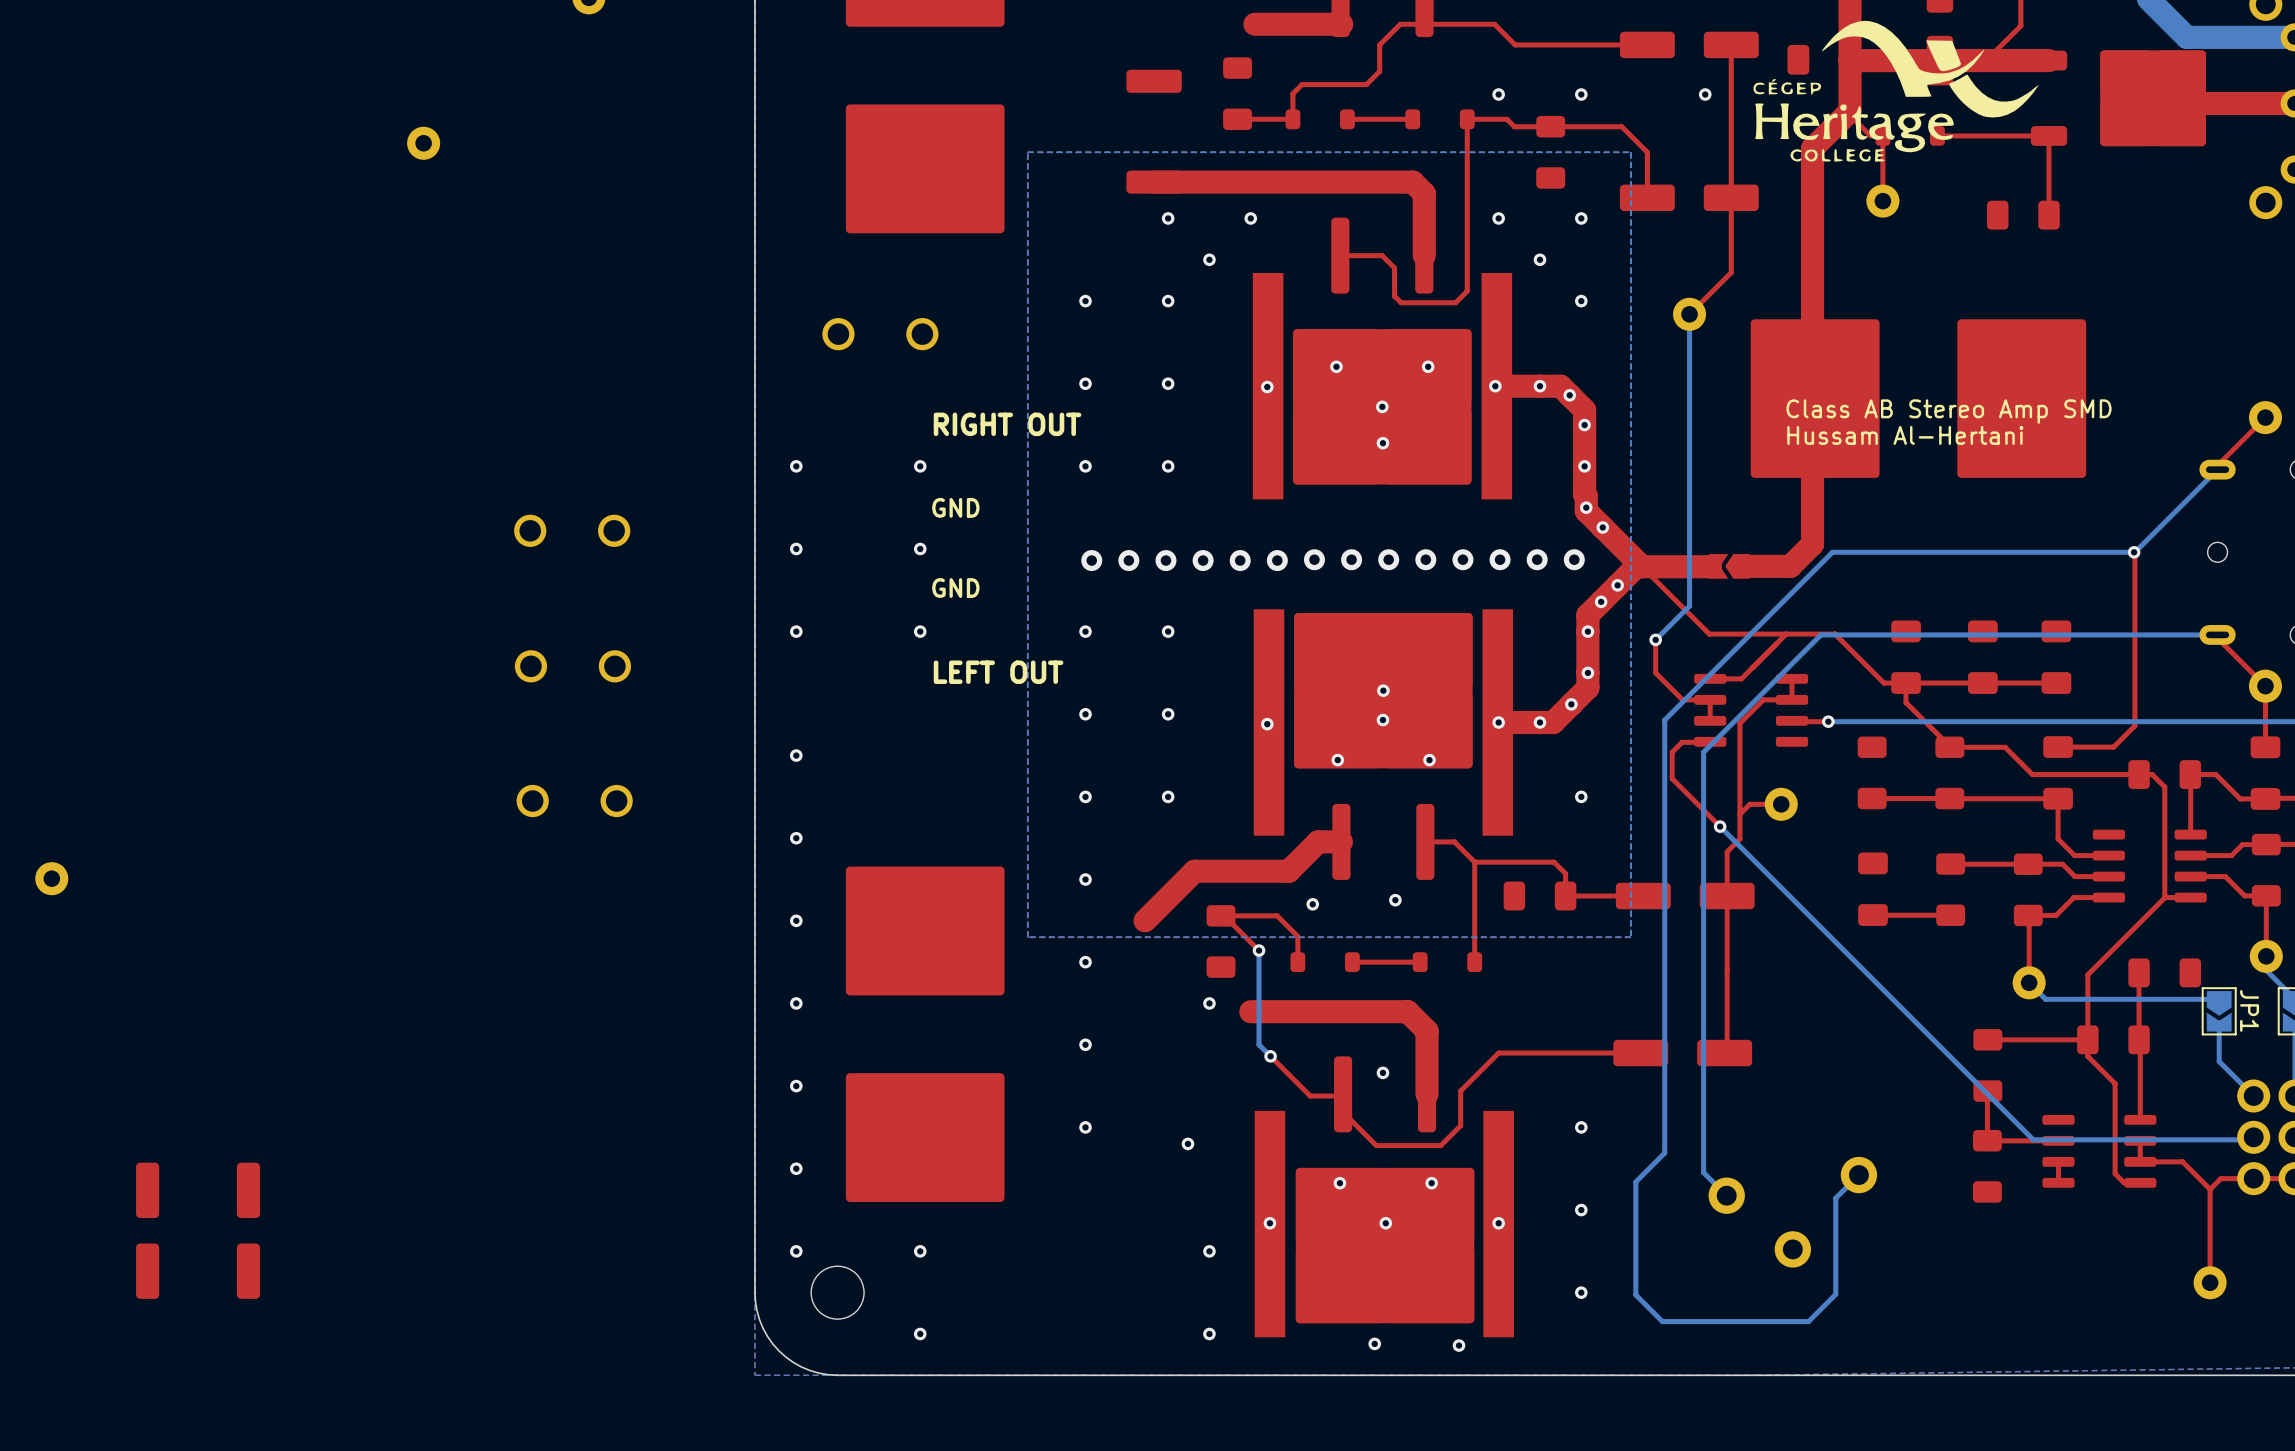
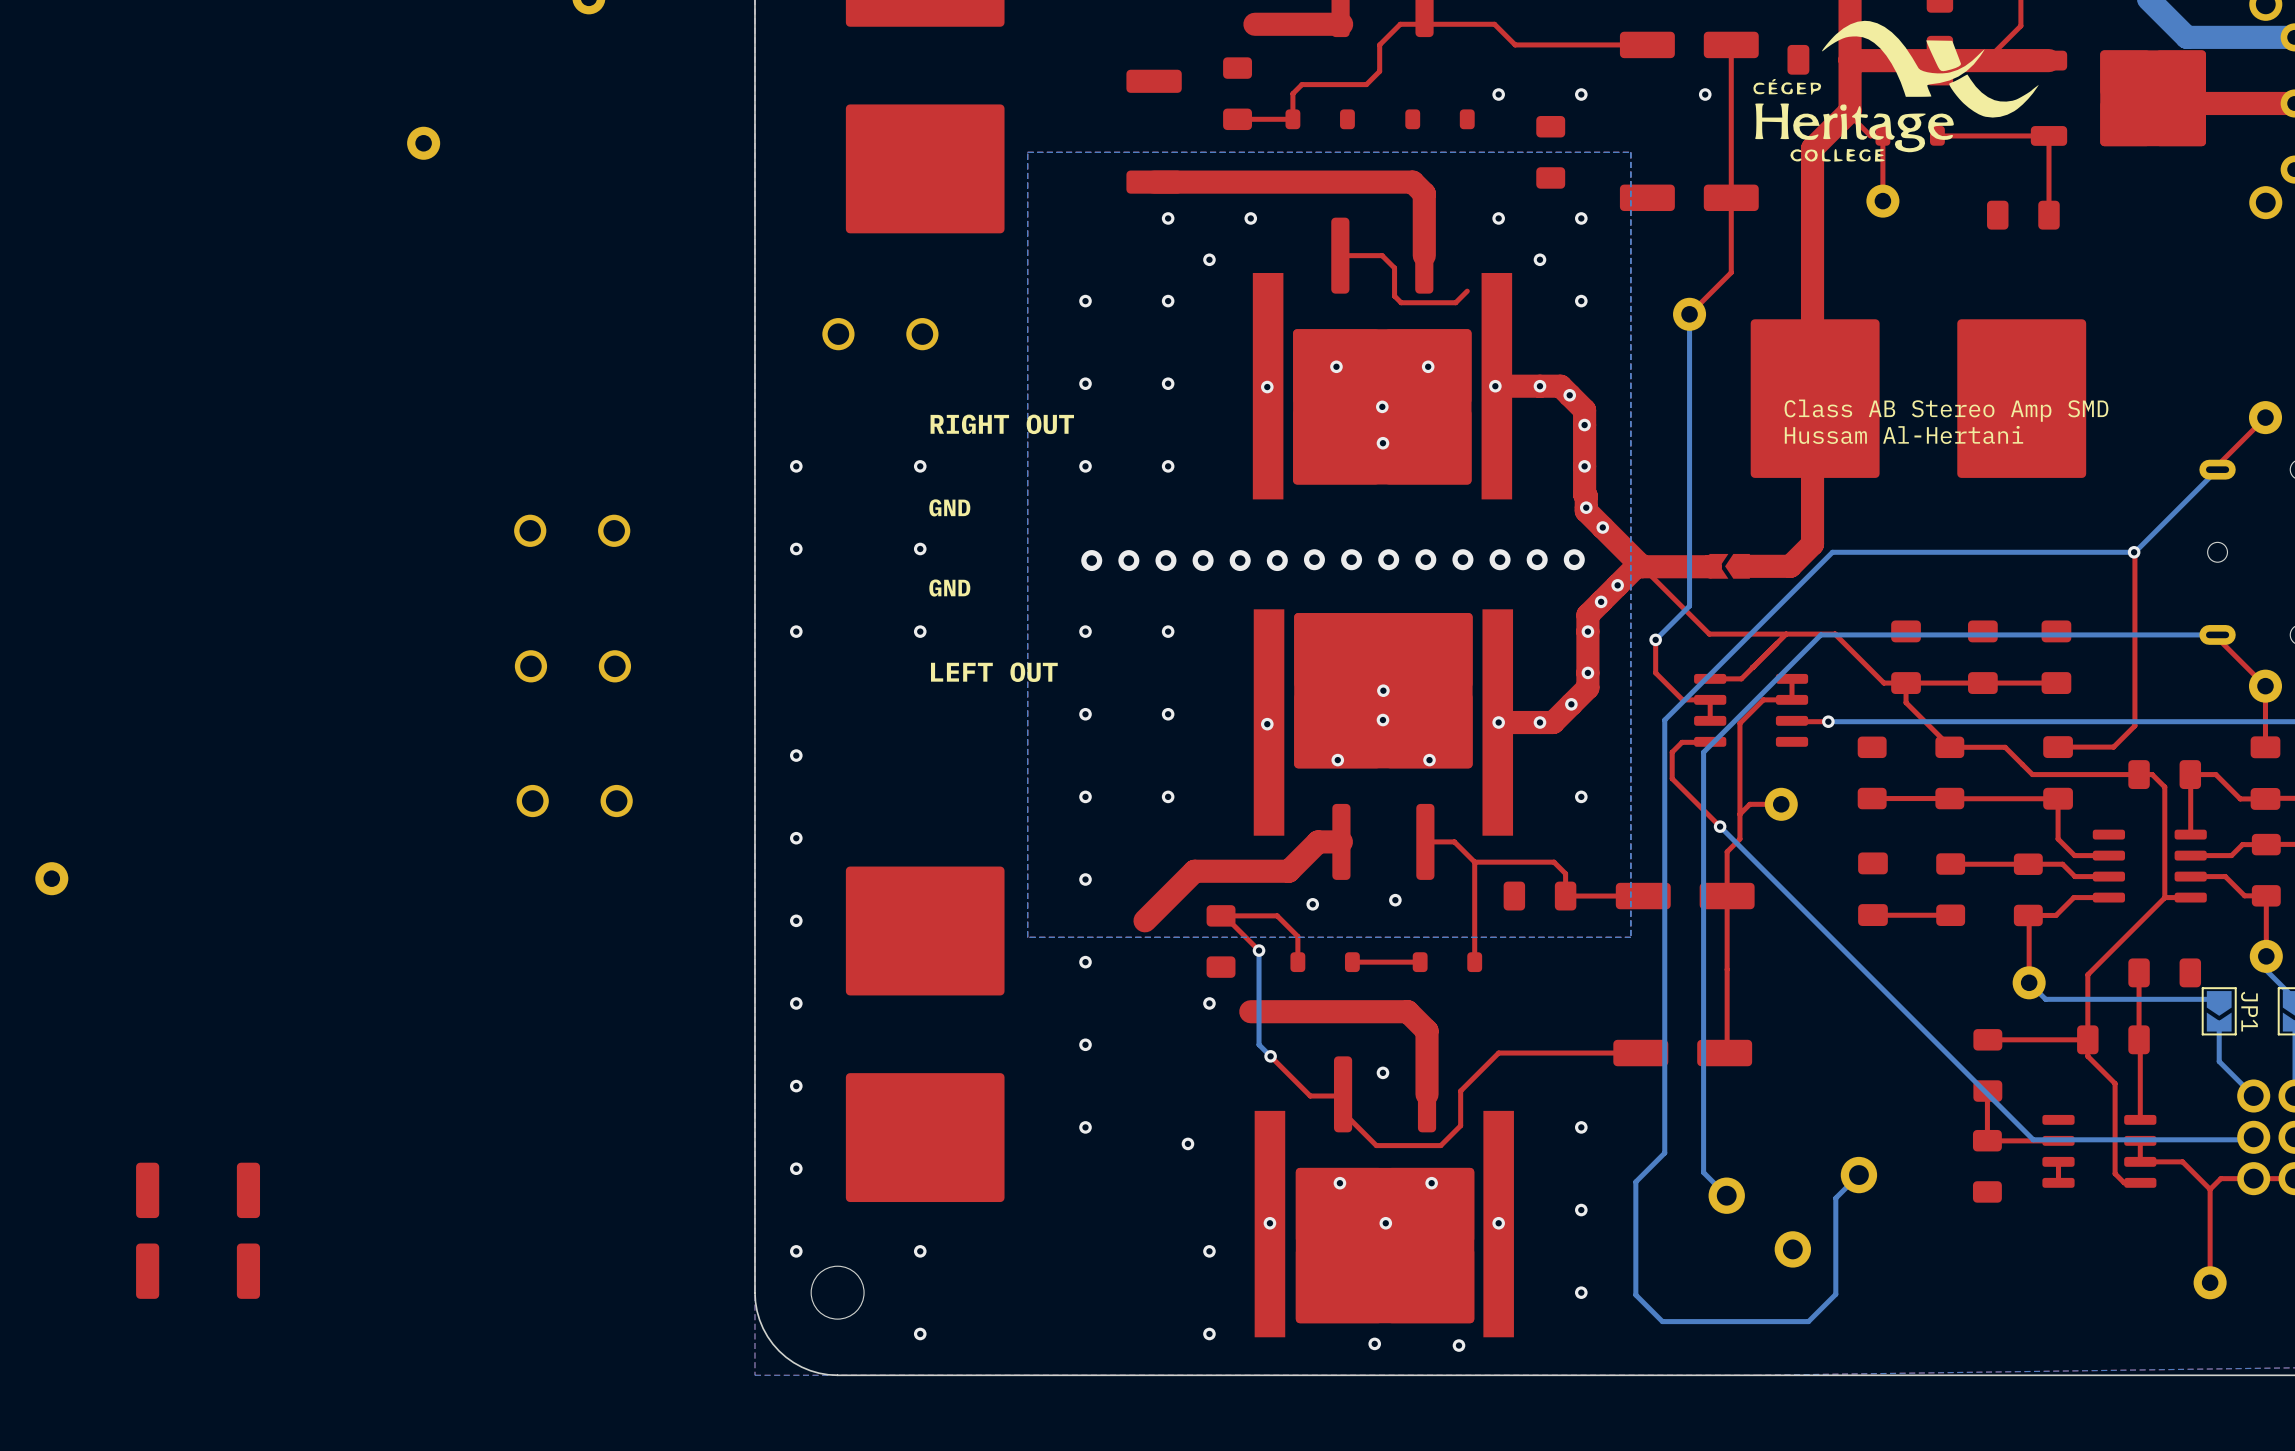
top track: (1412, 119) (1347, 119) -> none
top track: (1647, 197) (1647, 152) (1621, 126) (1514, 126) (1506, 119) (1467, 119) (1467, 291) -> none

